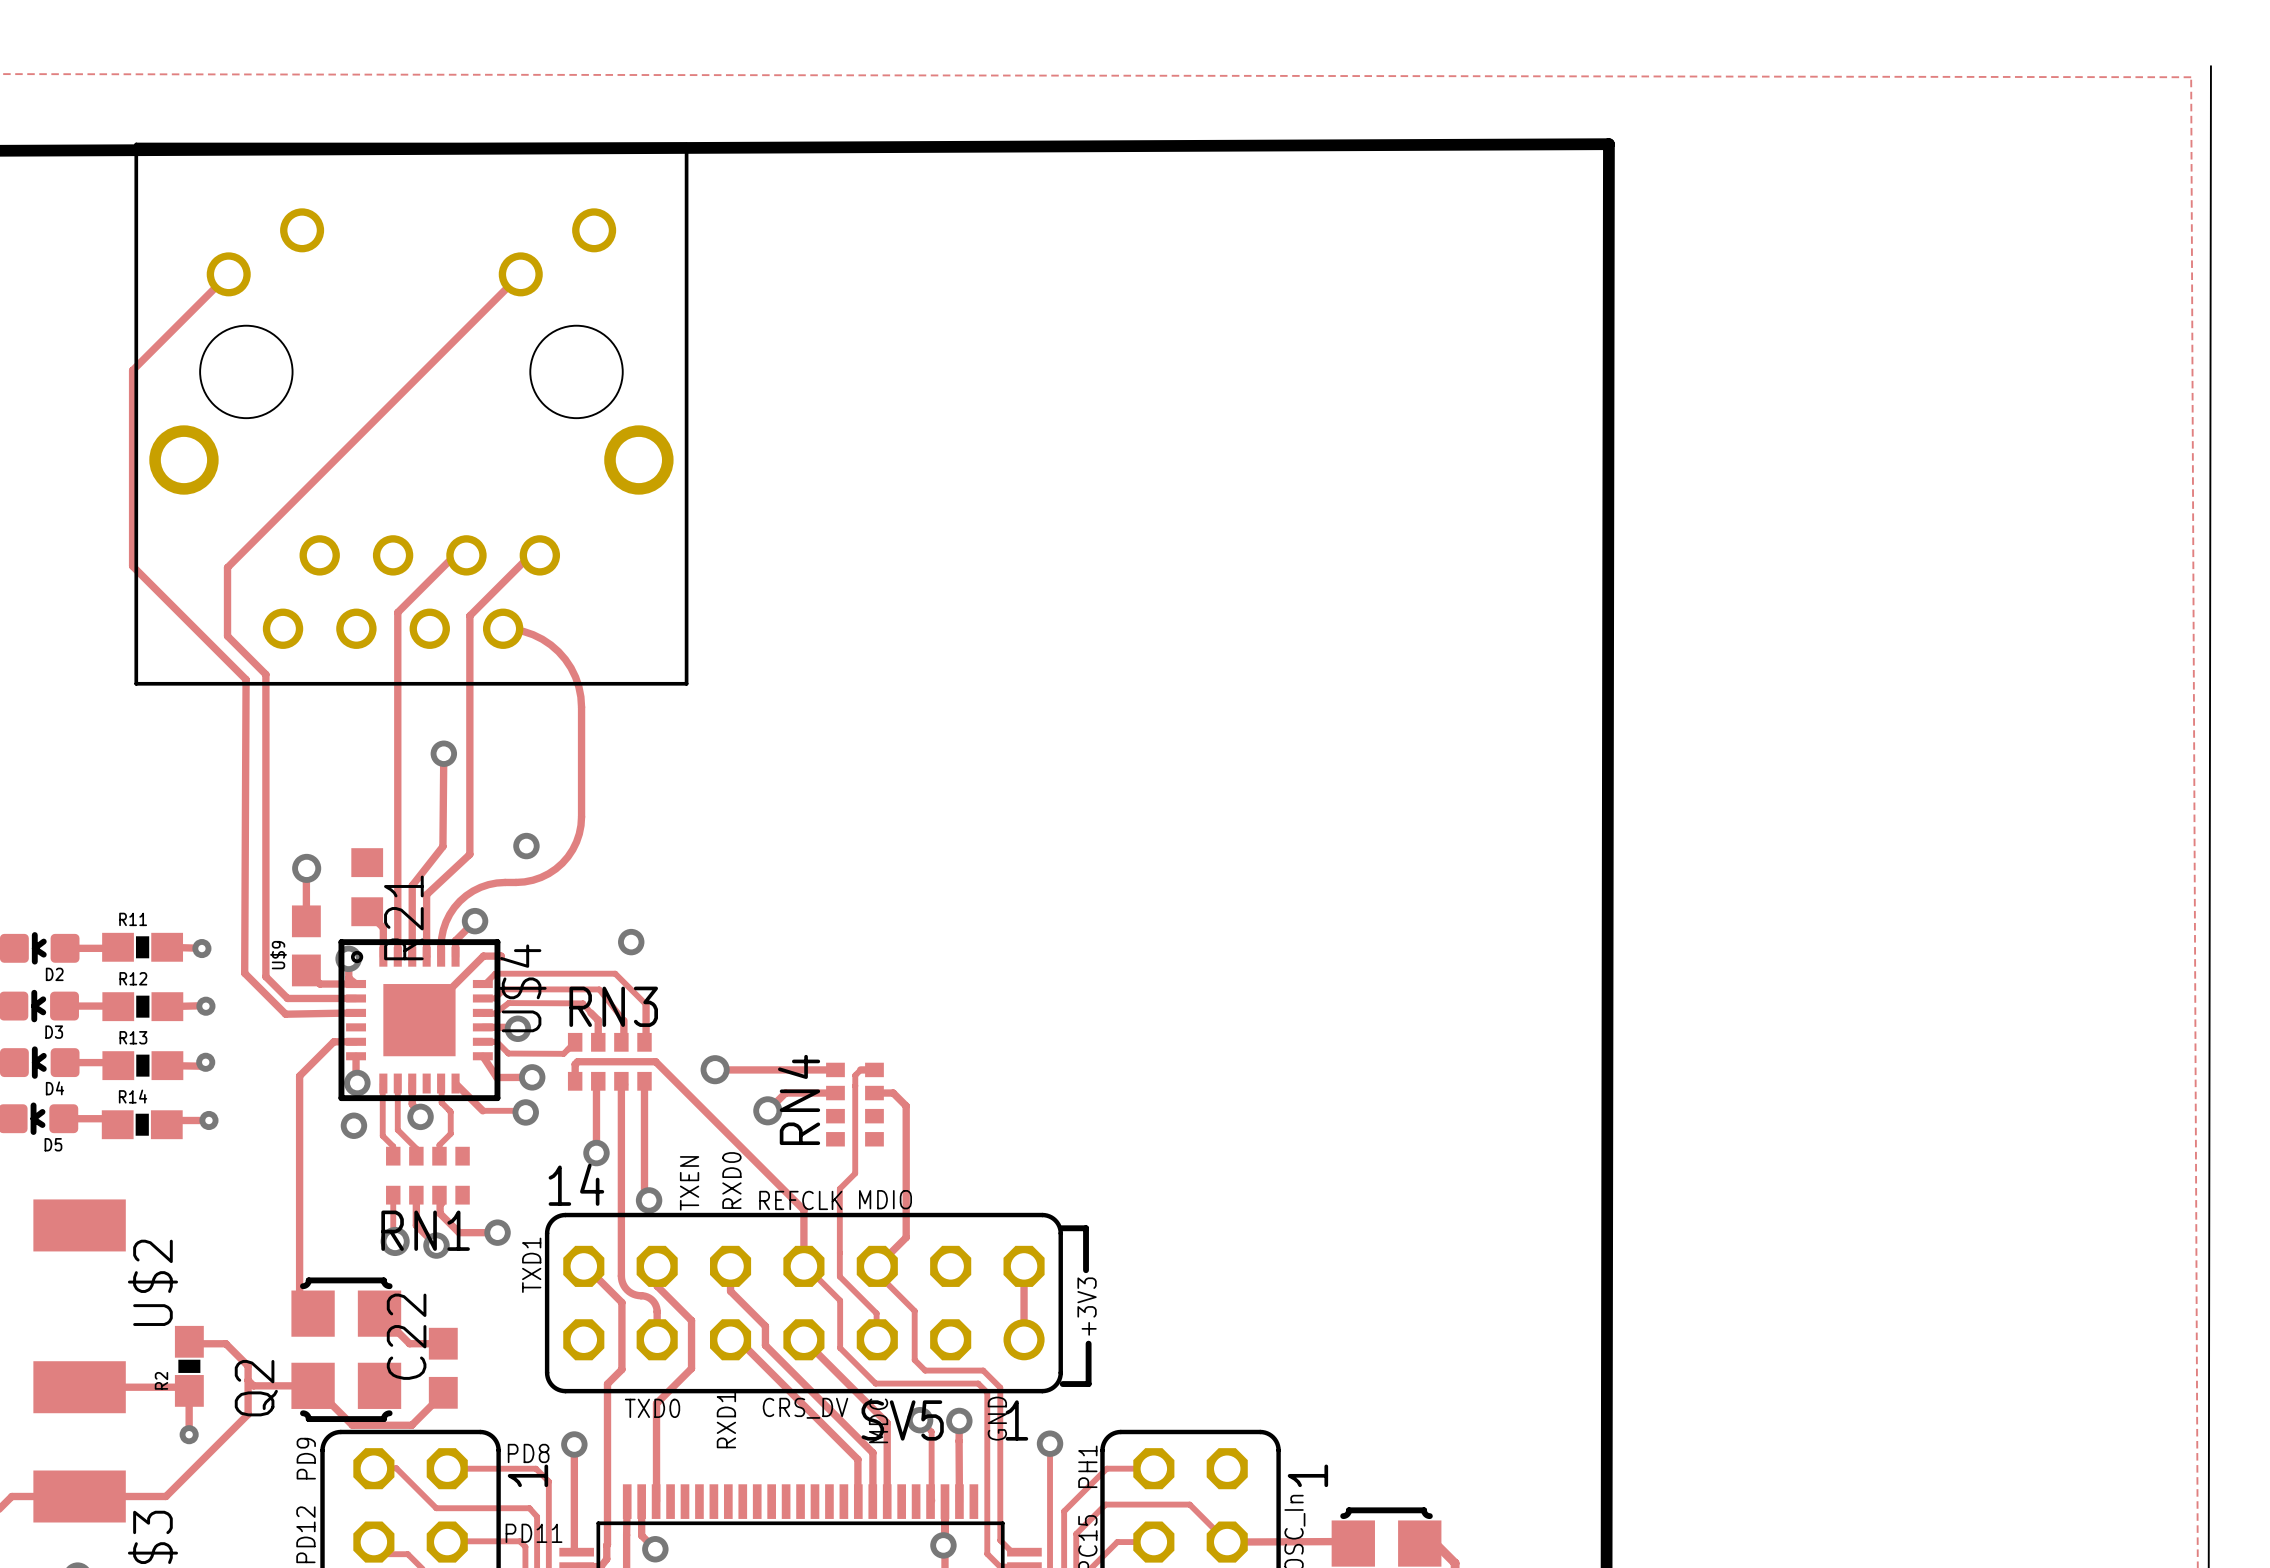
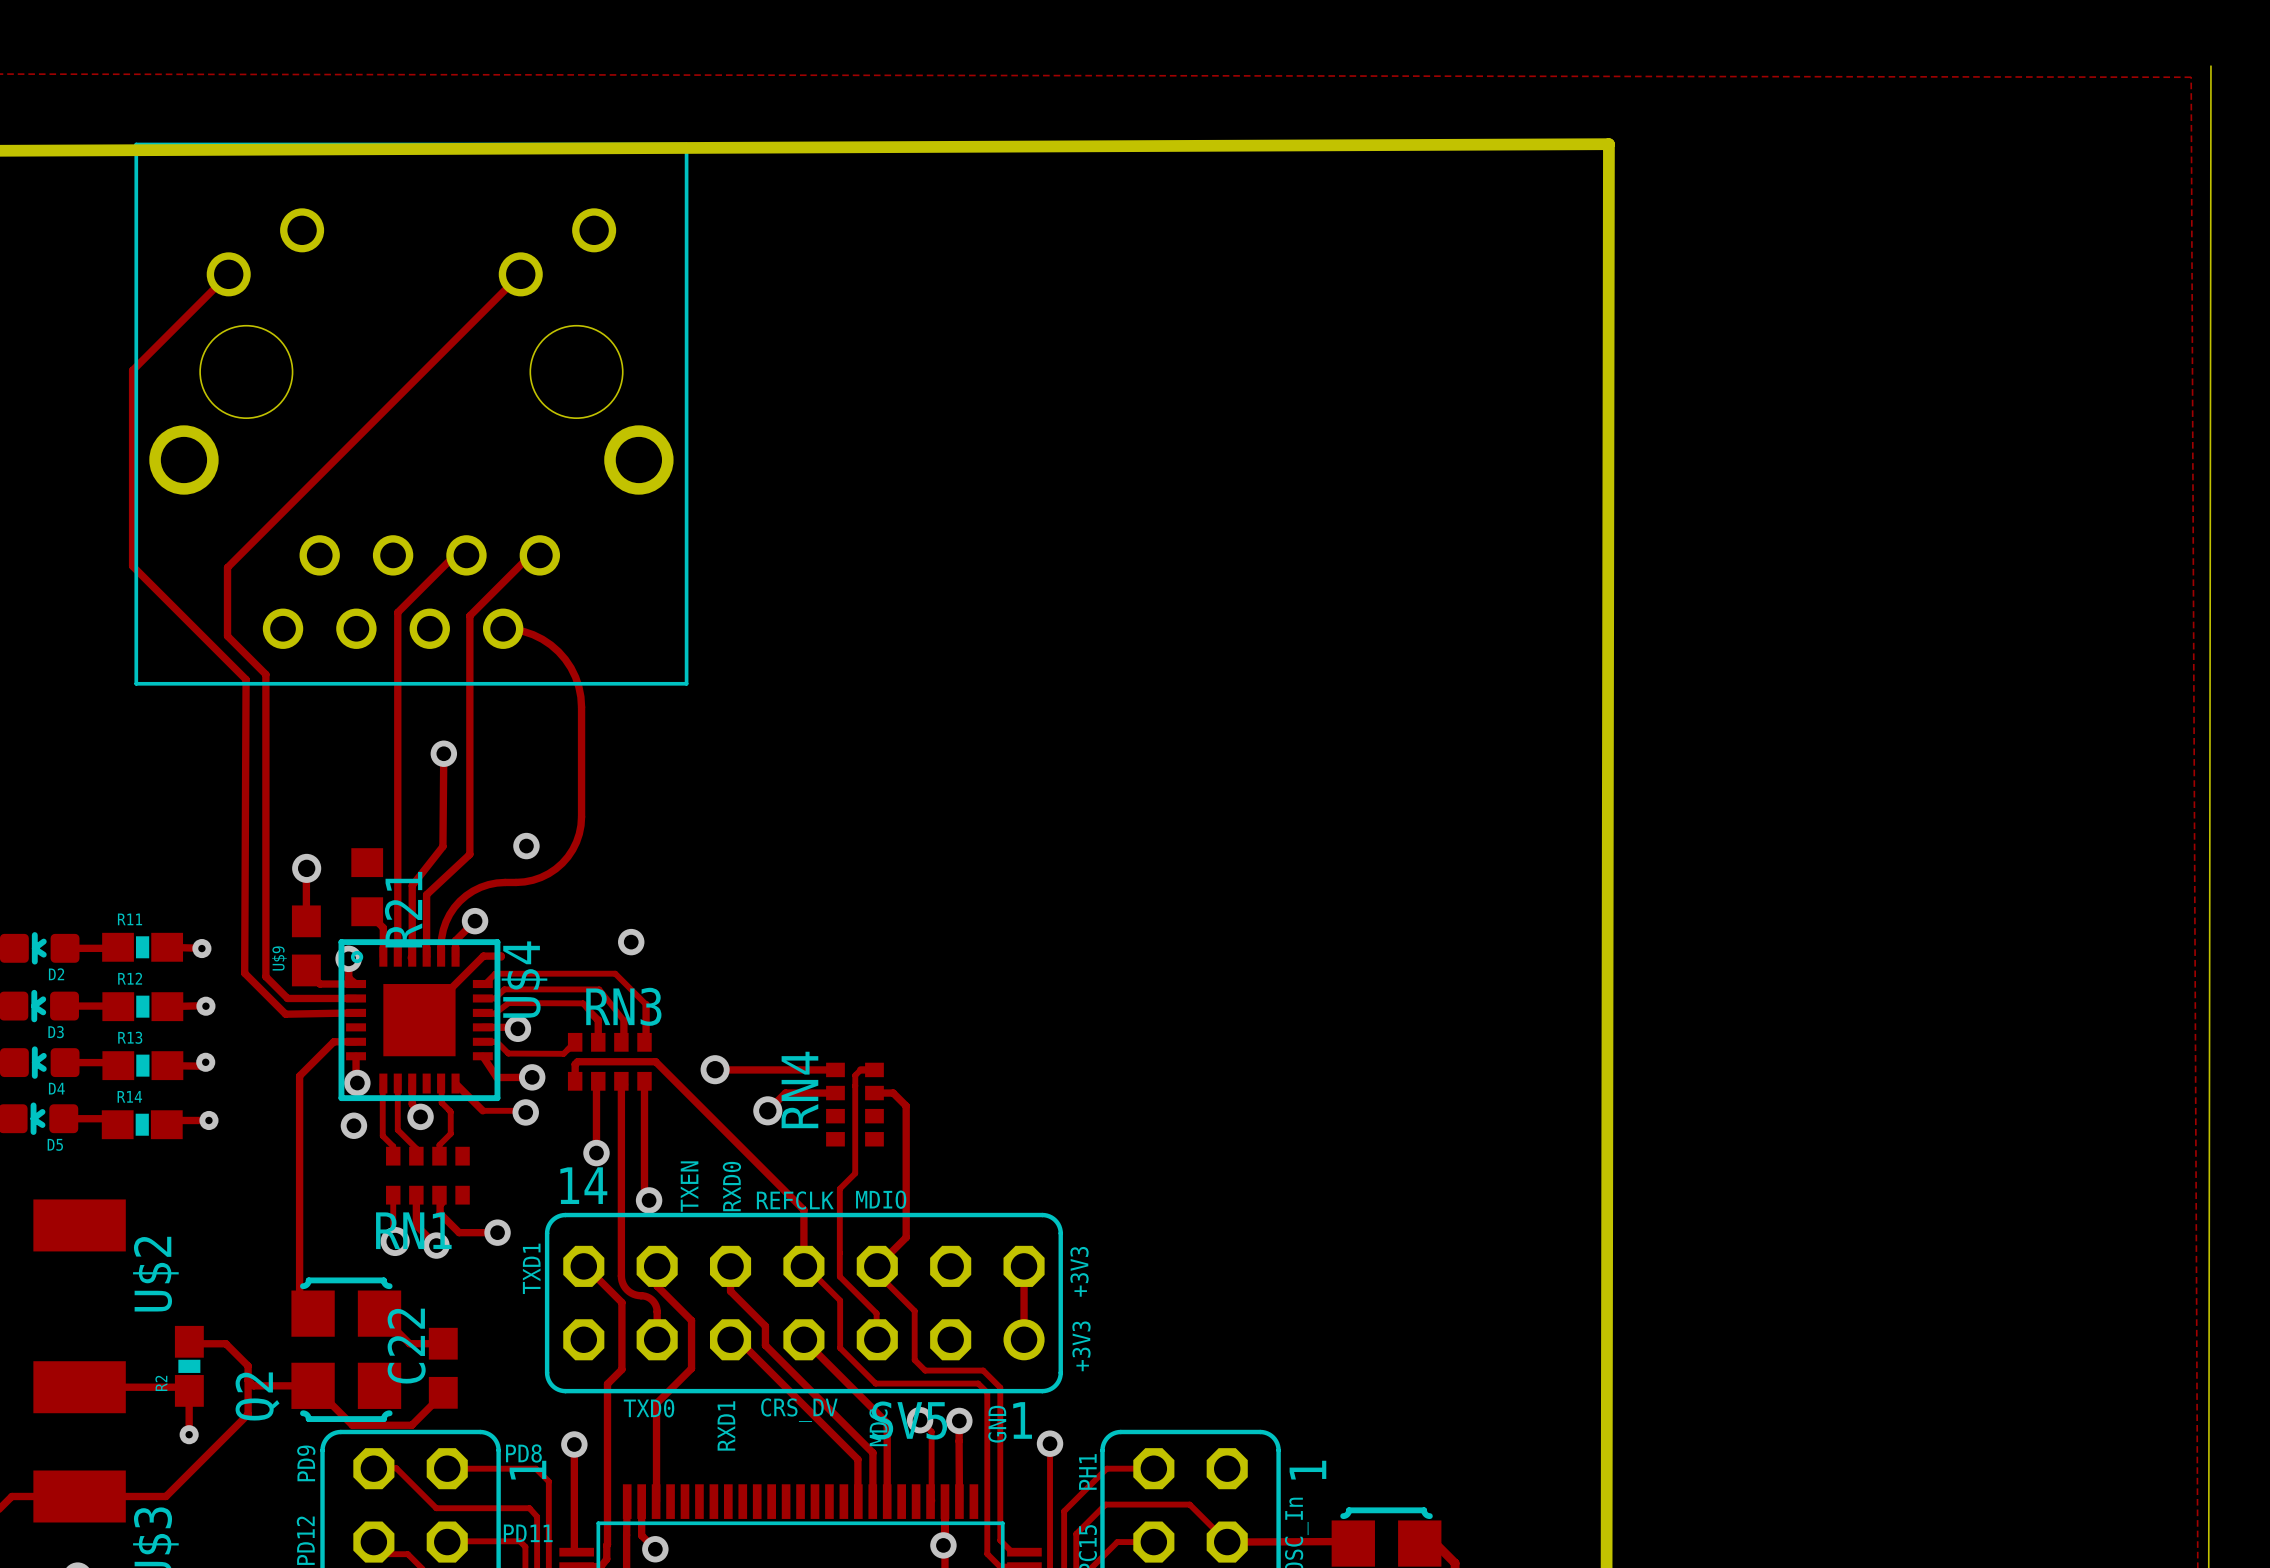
line: (1061, 1228) (1086, 1228) (1086, 1270) -> none
text: none -> +3V3 (1079, 1271)
text: +3V3 (1087, 1306) -> none
line: (1088, 1343) (1088, 1384) (1062, 1384) -> none
text: none -> +3V3 (1081, 1346)

